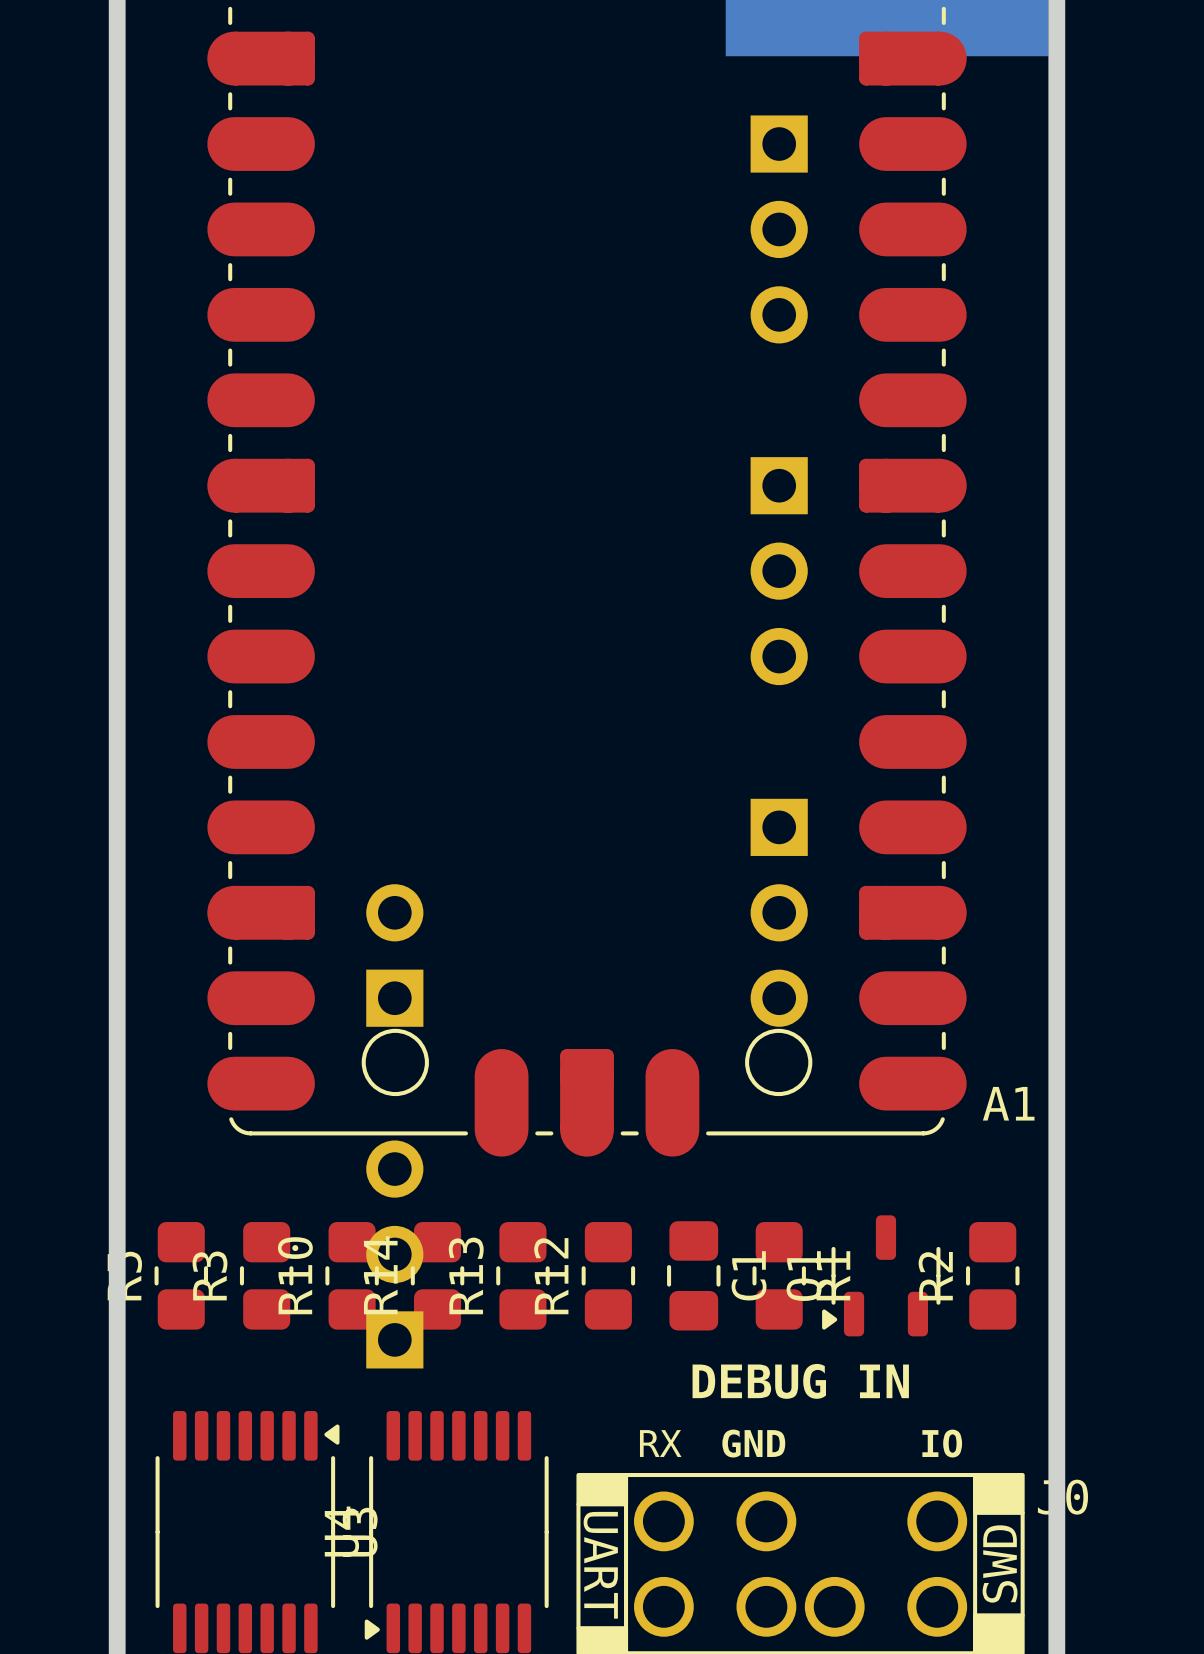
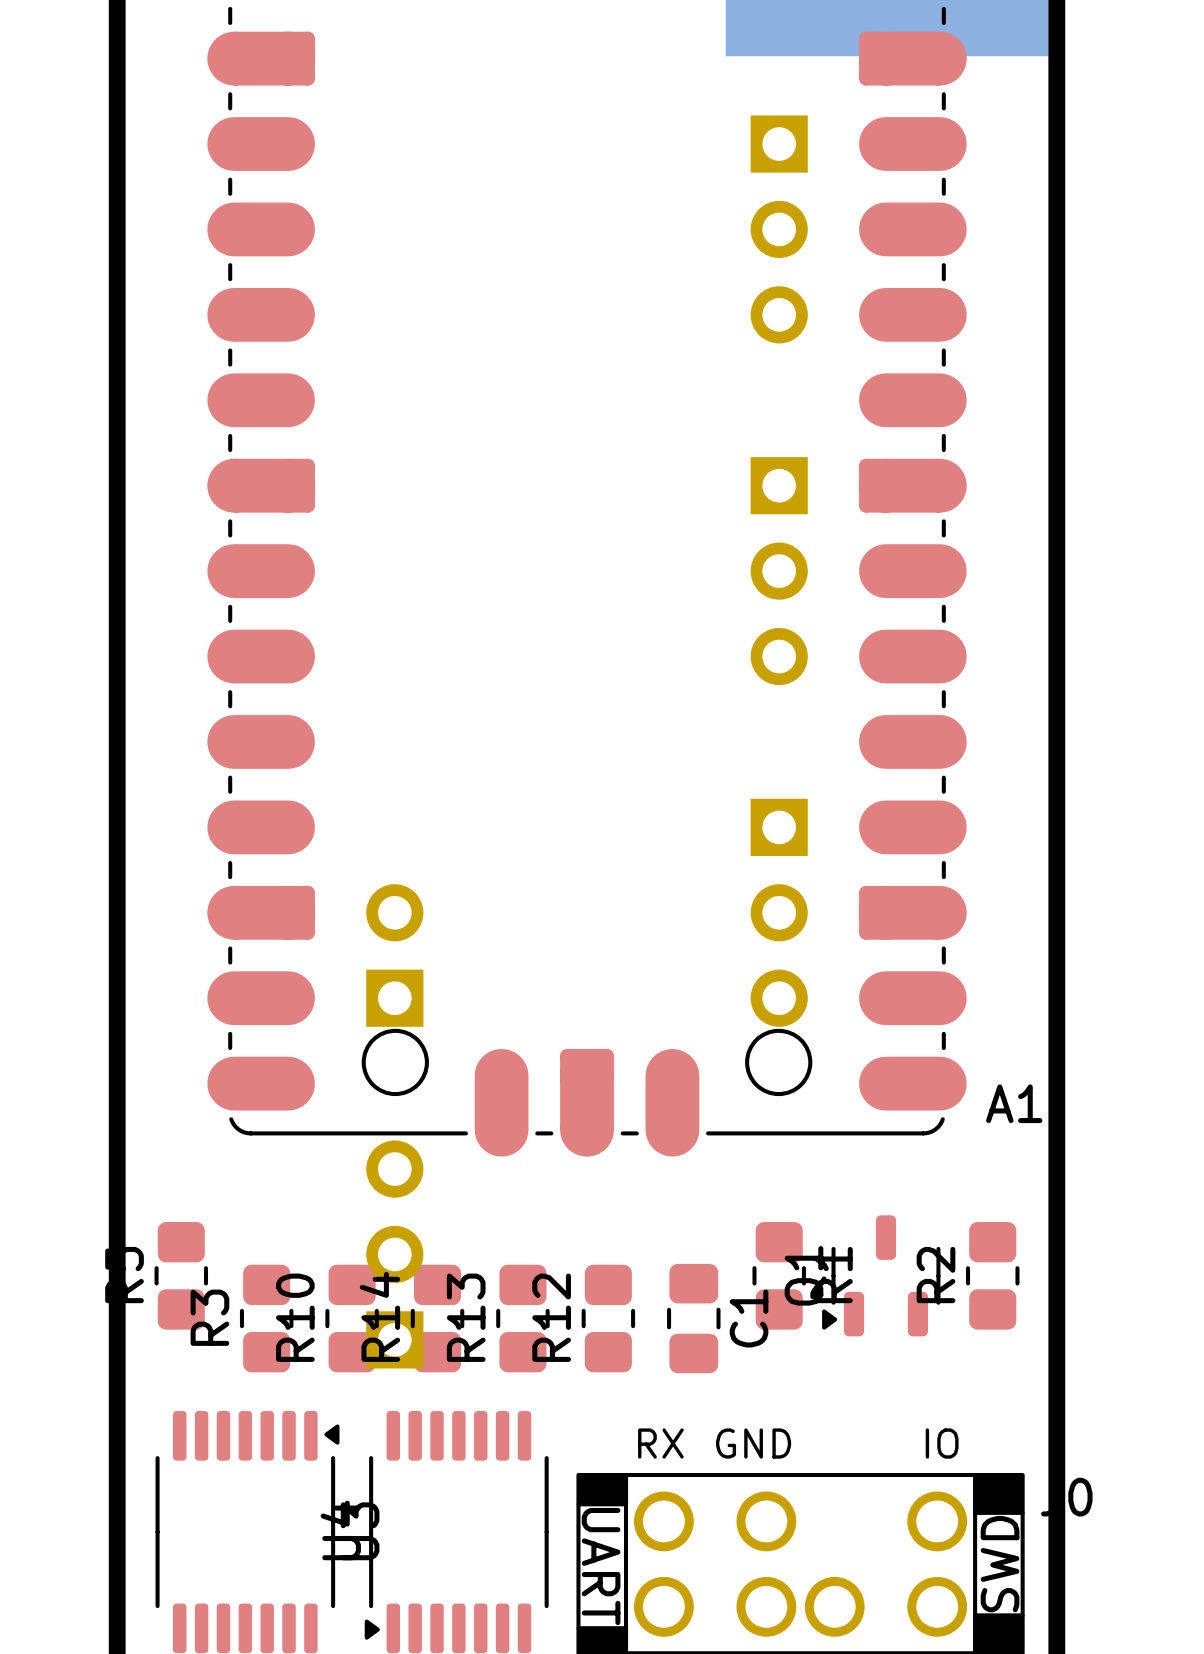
R3 position: (266, 1275) -> (266, 1318)
R10 position: (352, 1275) -> (352, 1318)
R14 position: (437, 1275) -> (437, 1318)
R13 position: (522, 1275) -> (522, 1318)
R12 position: (608, 1275) -> (608, 1318)
C1 position: (693, 1275) -> (693, 1318)
text: DEBUG IN (800, 1381) -> none

